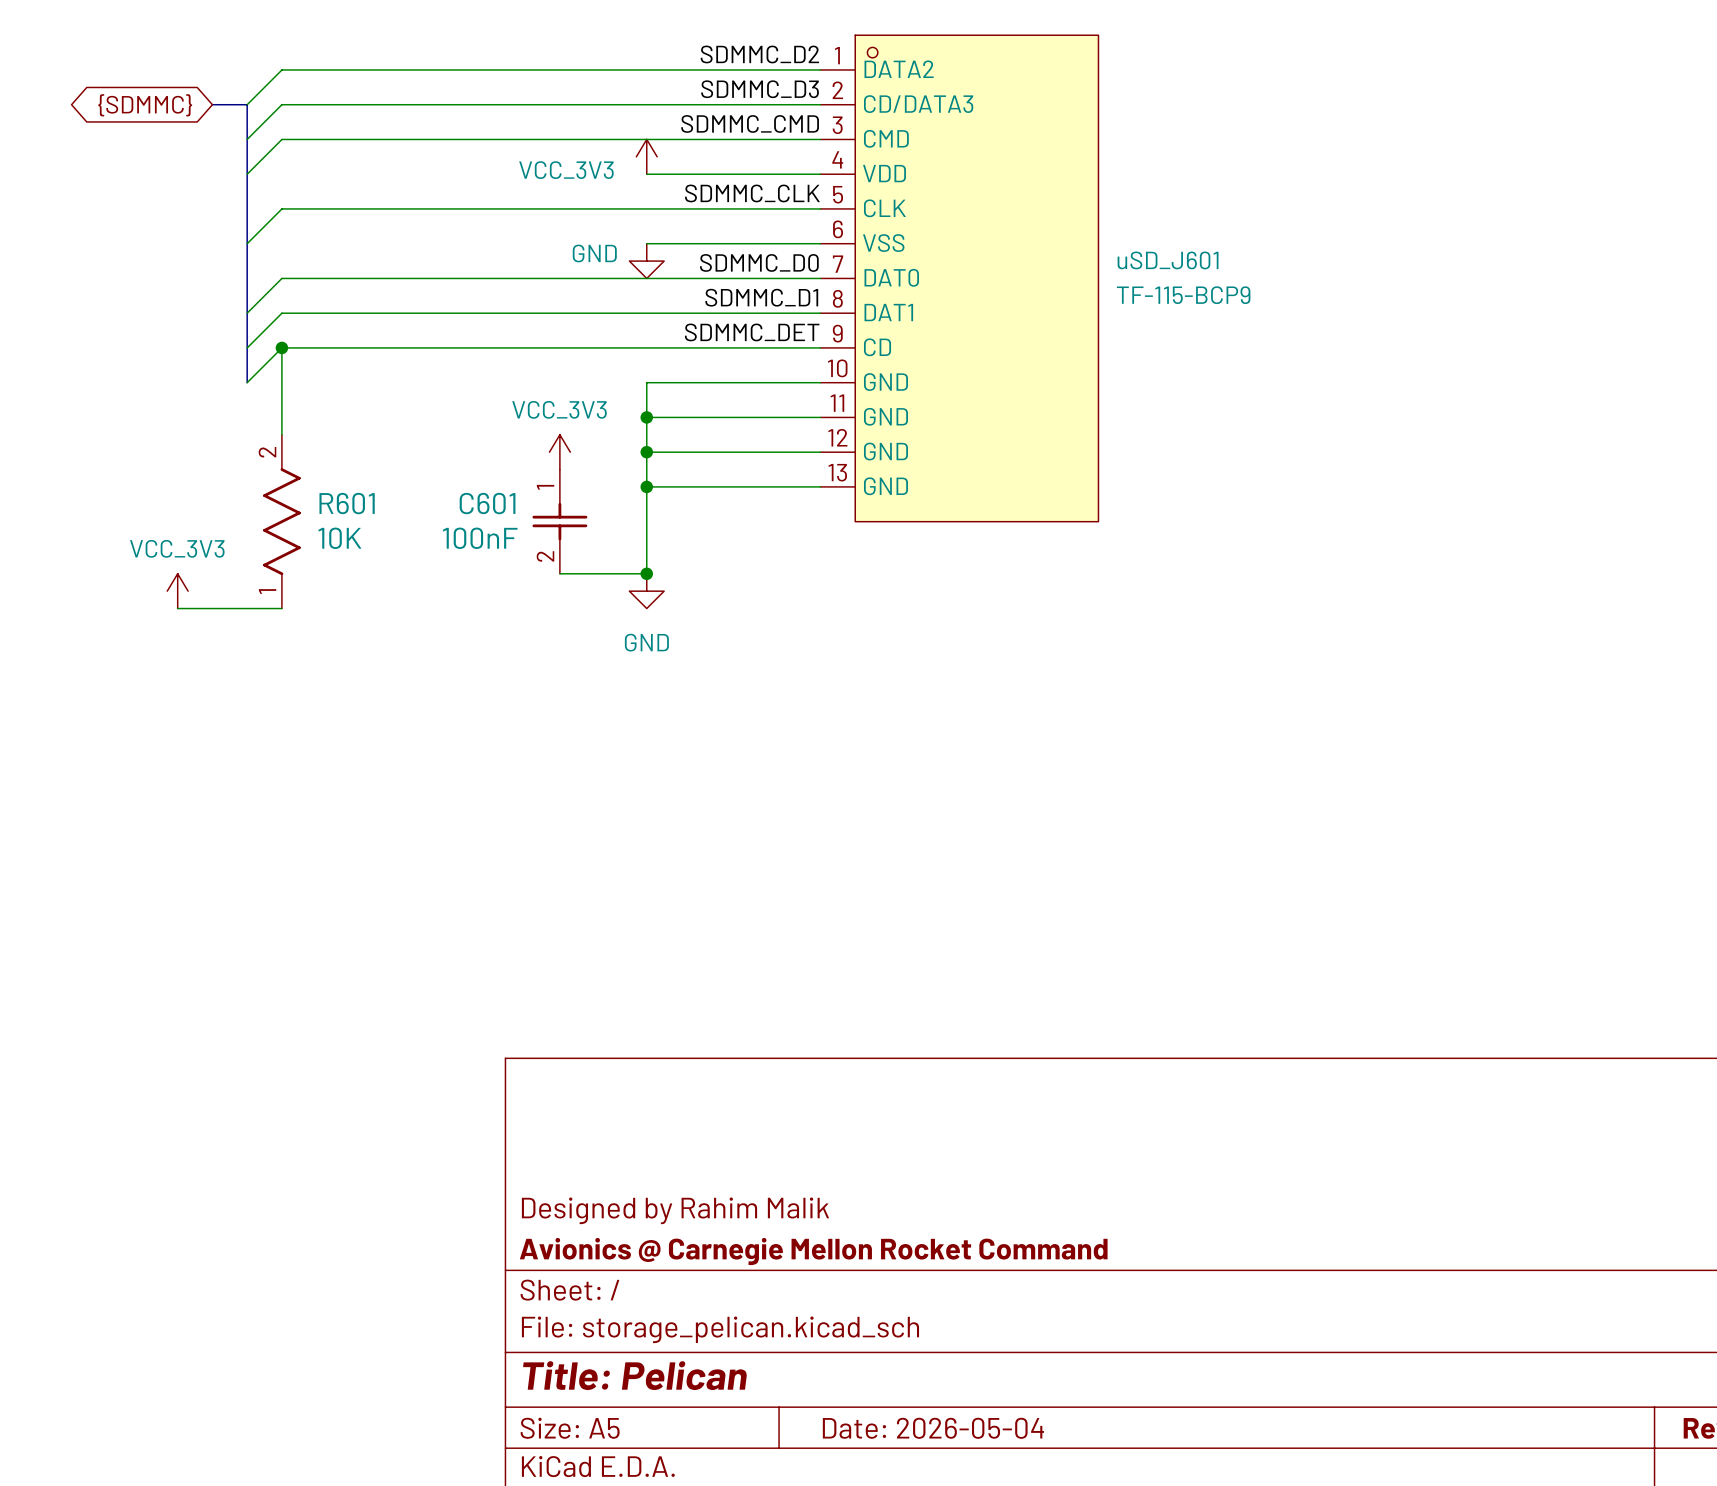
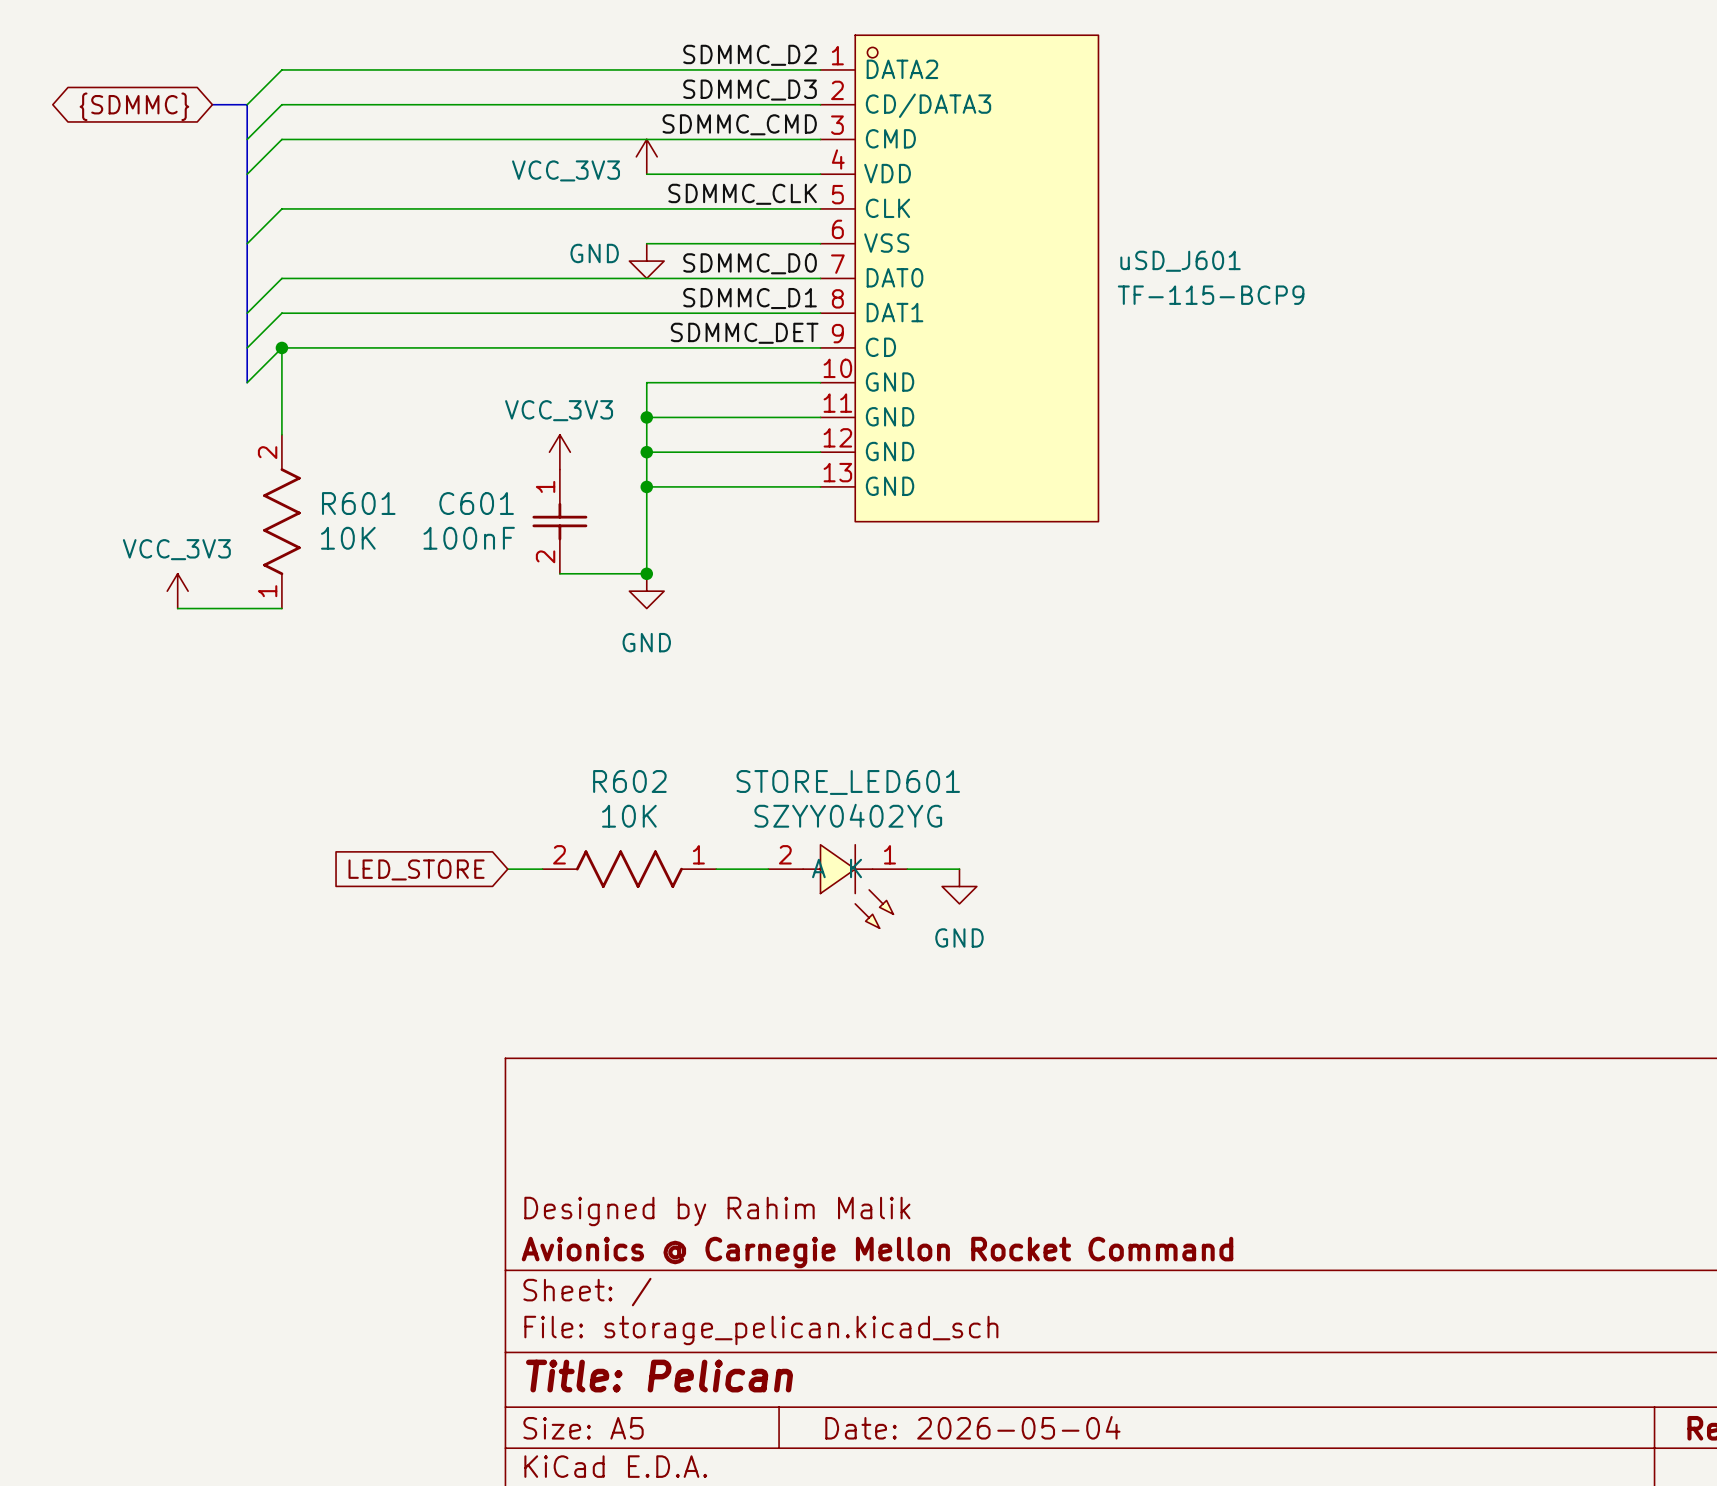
global label: none -> LED_STORE (416, 869)
wire: none -> (507, 869) (542, 869)
R602: none -> 10K (629, 869)
wire: none -> (716, 869) (768, 869)
wire: none -> (907, 869) (959, 869)
STORE_LED601: none -> SZYY0402YG (837, 886)
power symbol: none -> GND (959, 886)

